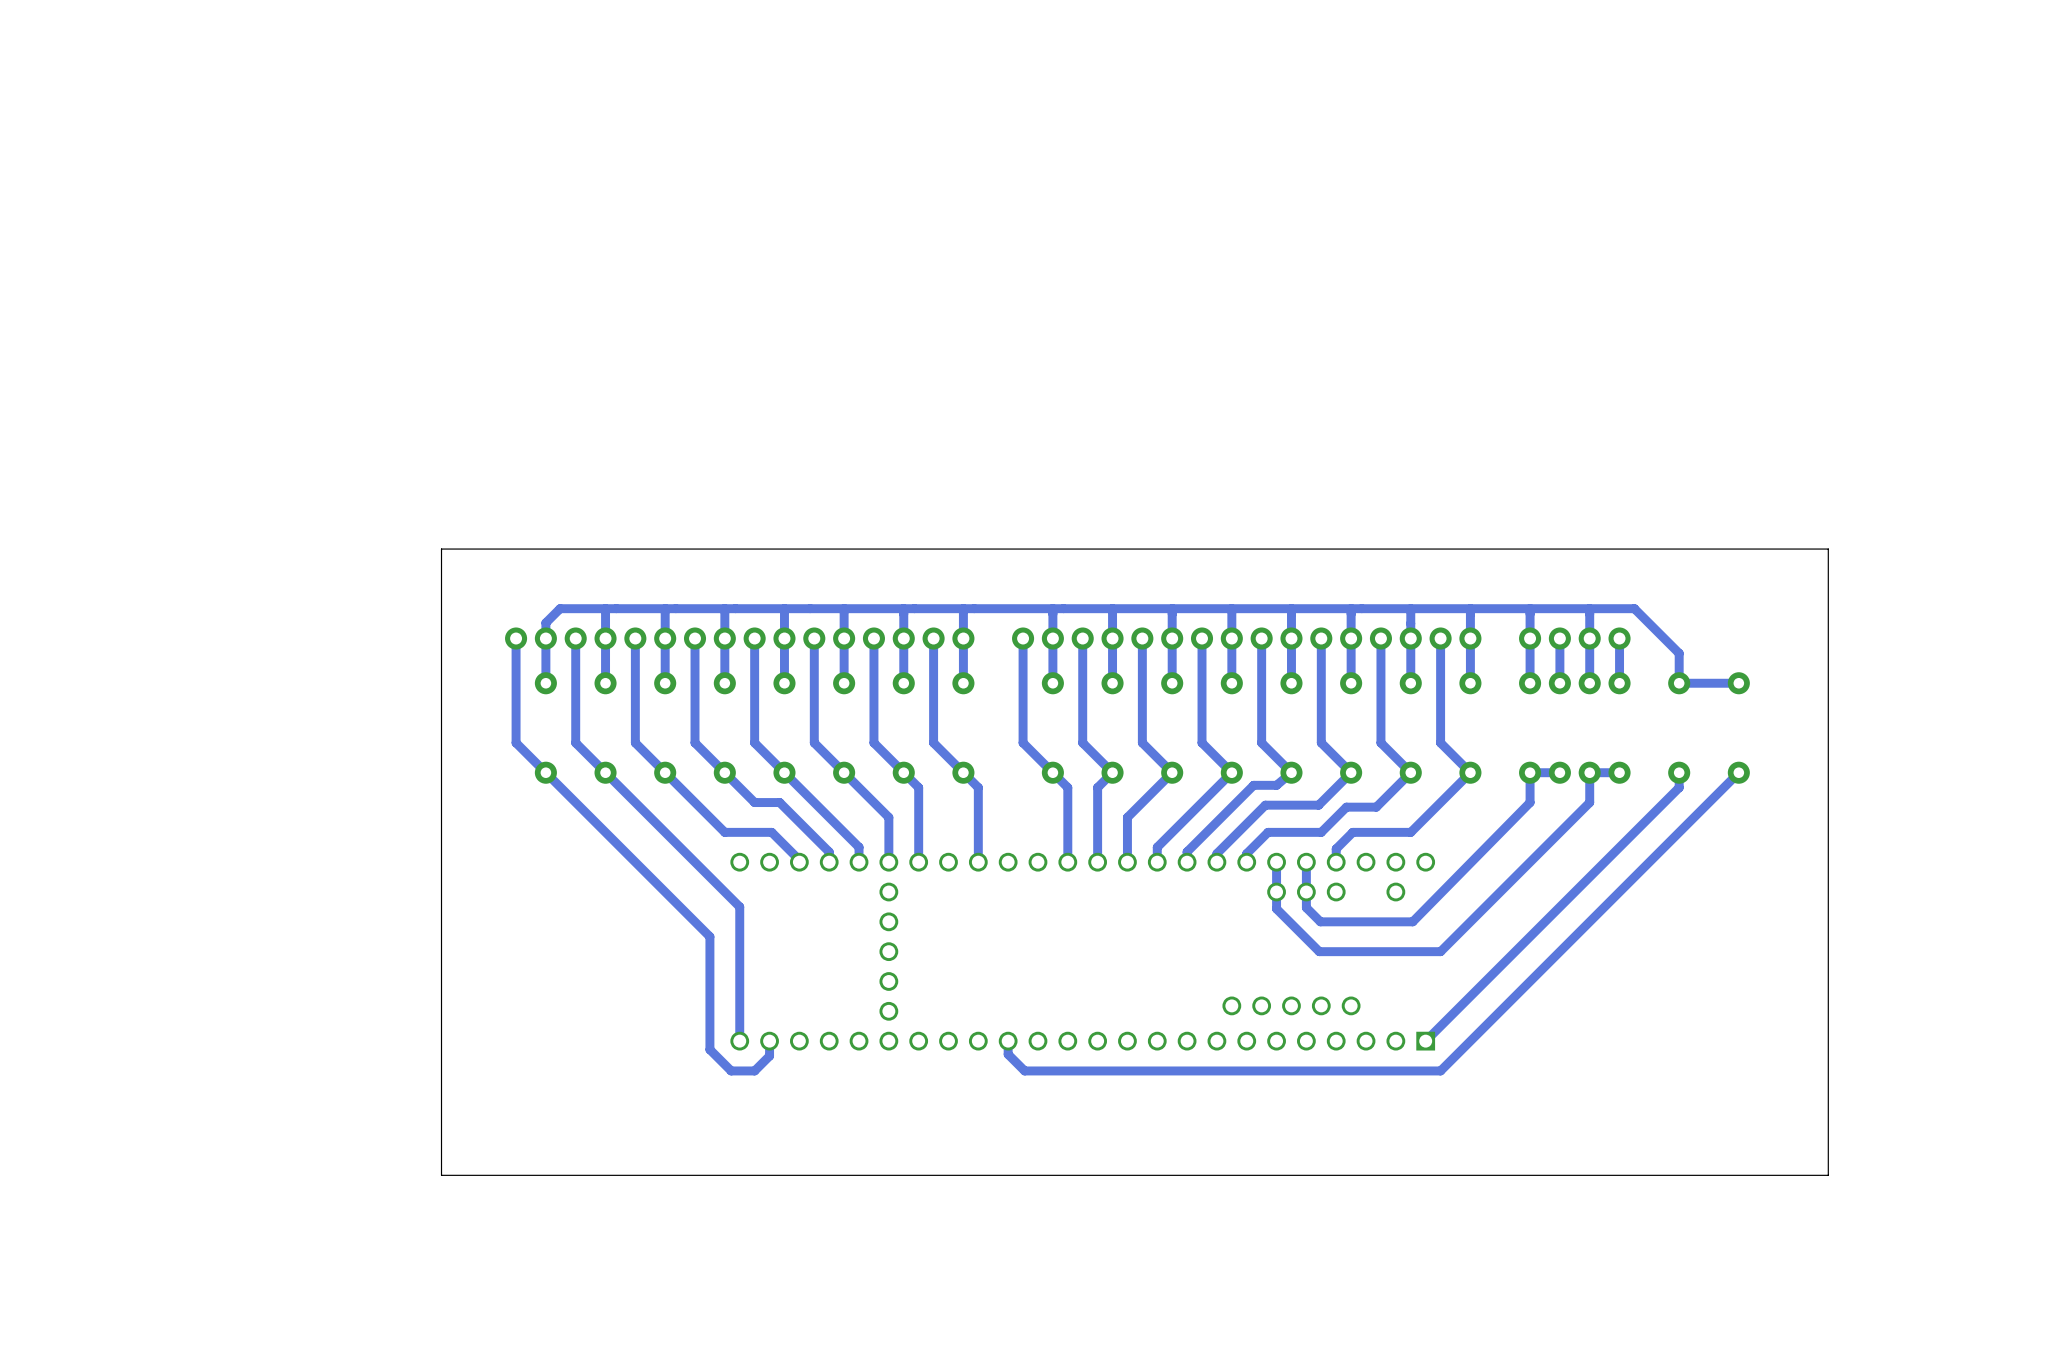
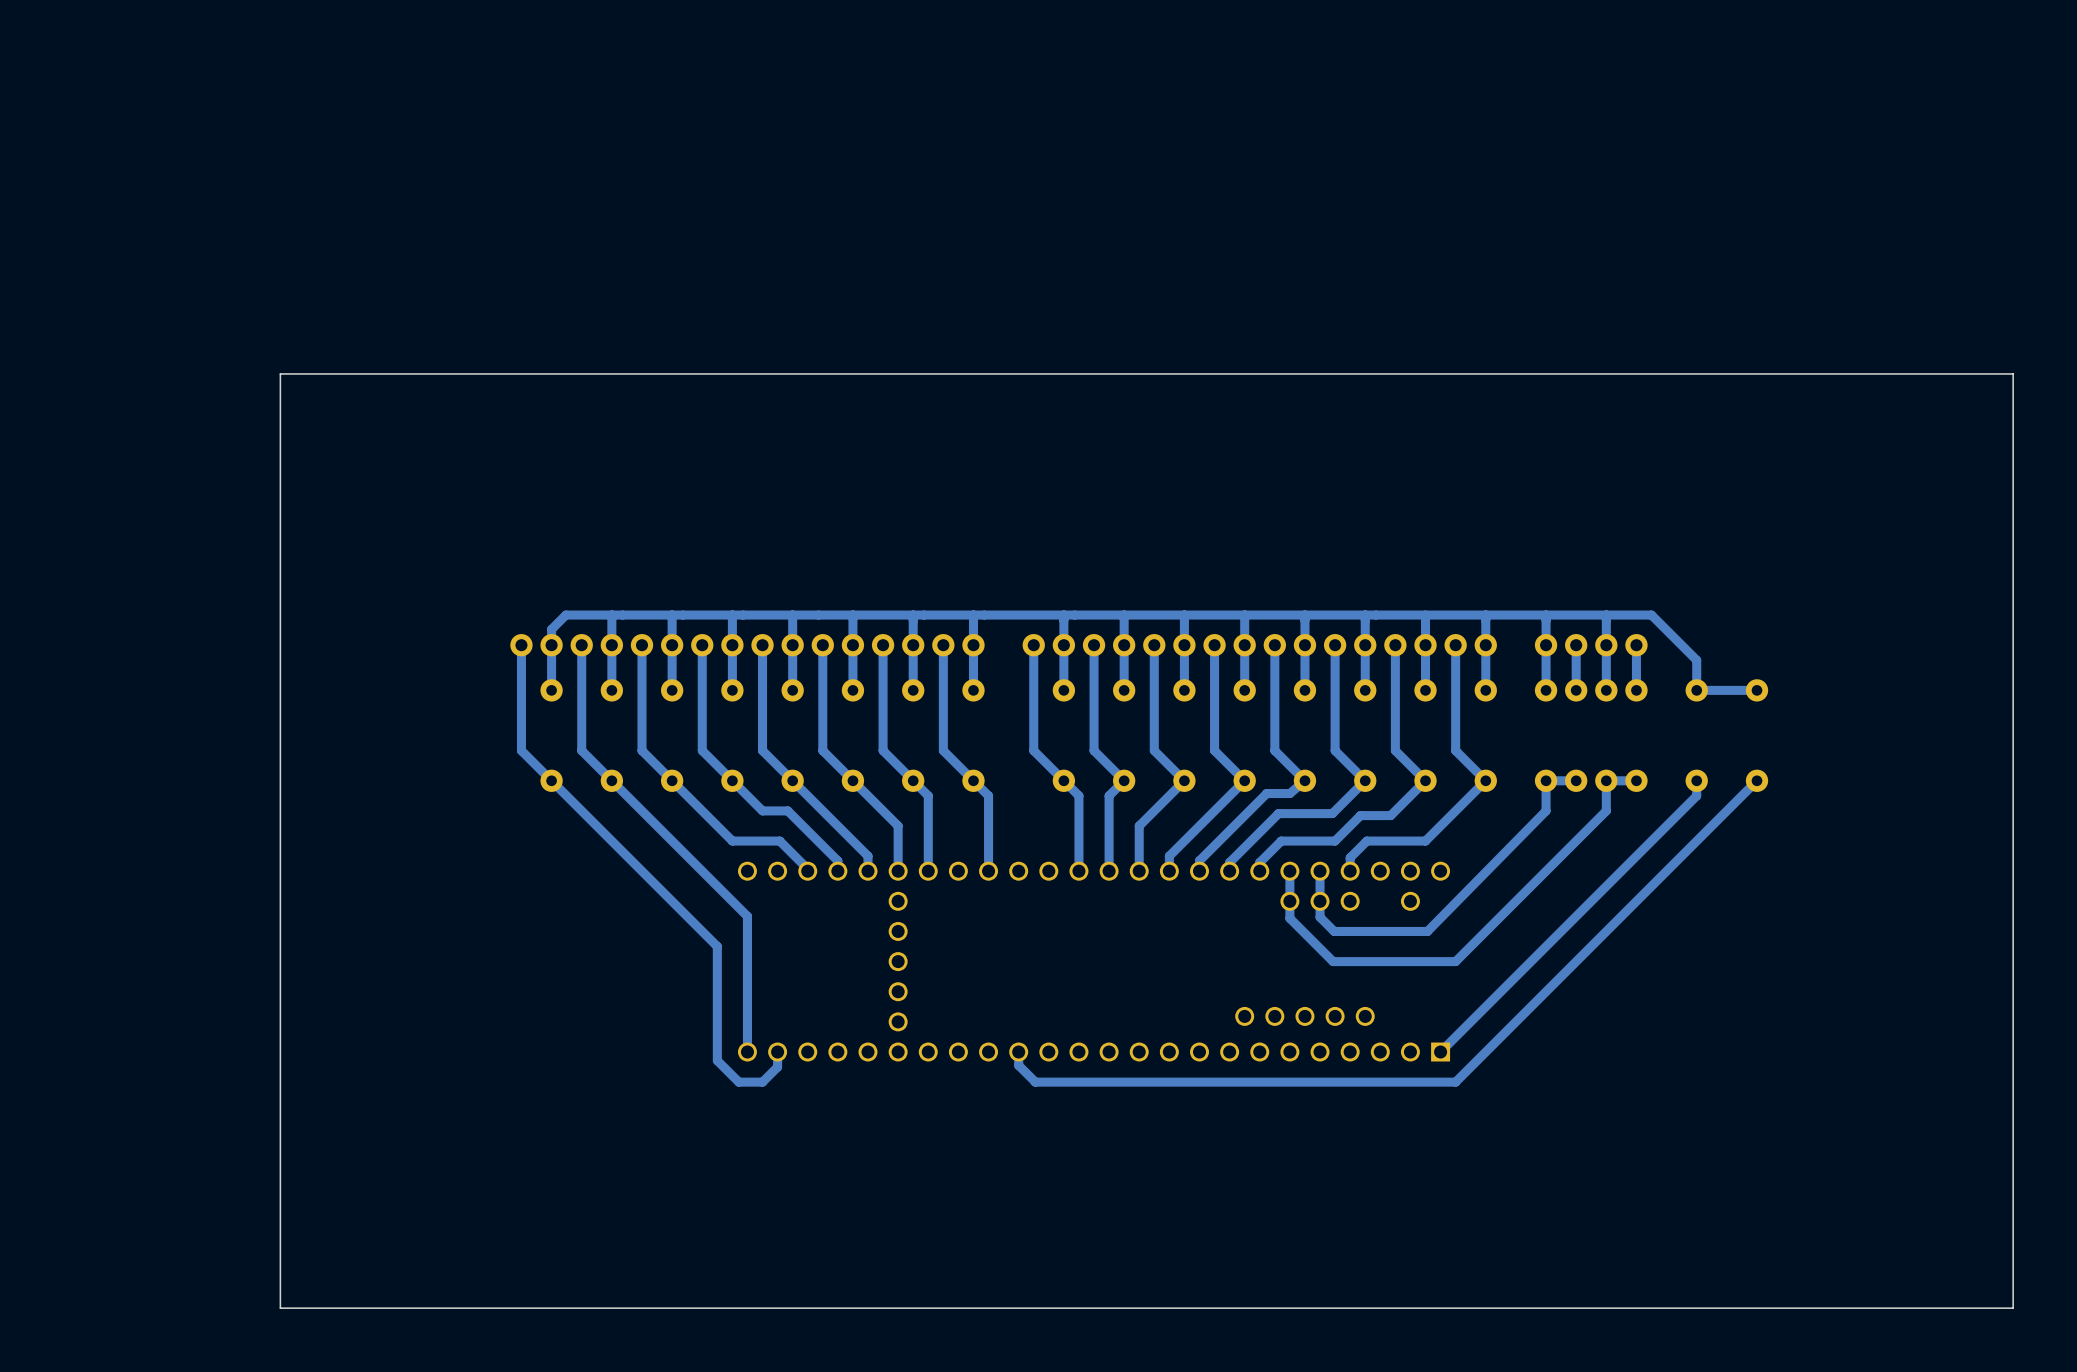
board edge: (1828, 549) (441, 549) (441, 1175) (1828, 1175) (1828, 549) -> (2013, 373) (2013, 1308) (280, 1308) (280, 373) (2013, 373)

